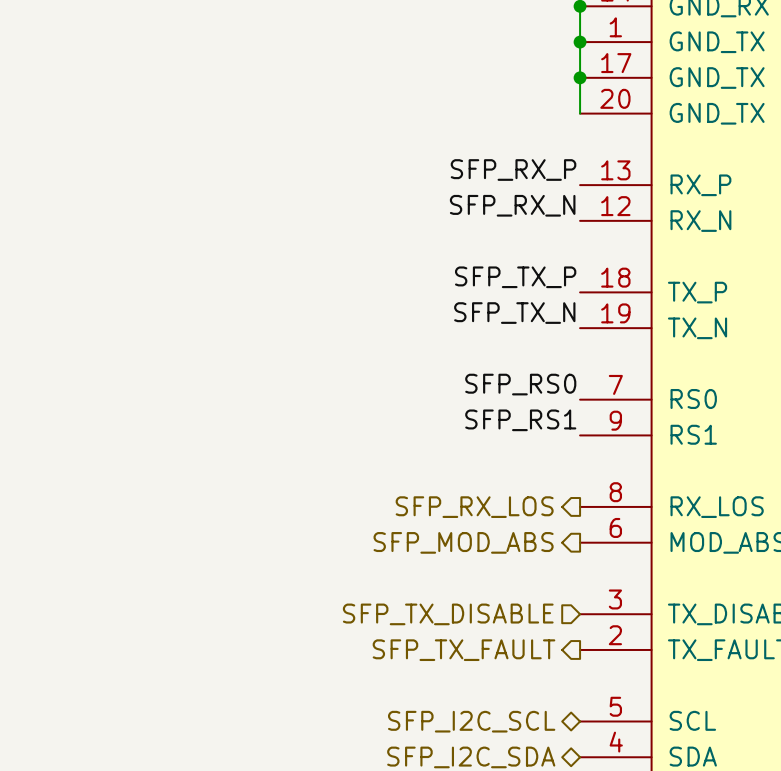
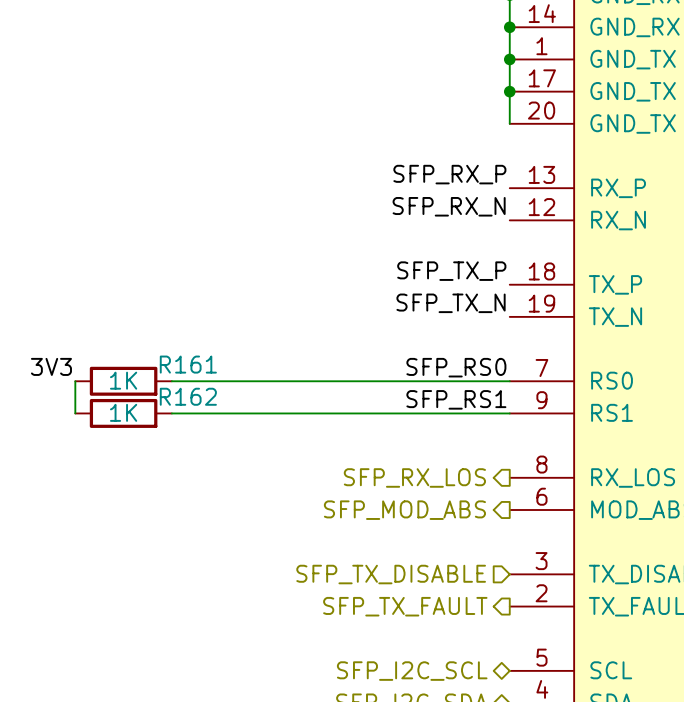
label: none -> 3V3 (51, 366)
wire: none -> (75, 381) (75, 413)
R161: none -> 1K (123, 381)
wire: none -> (171, 381) (509, 381)
R162: none -> 1K (123, 413)
wire: none -> (171, 413) (509, 413)

